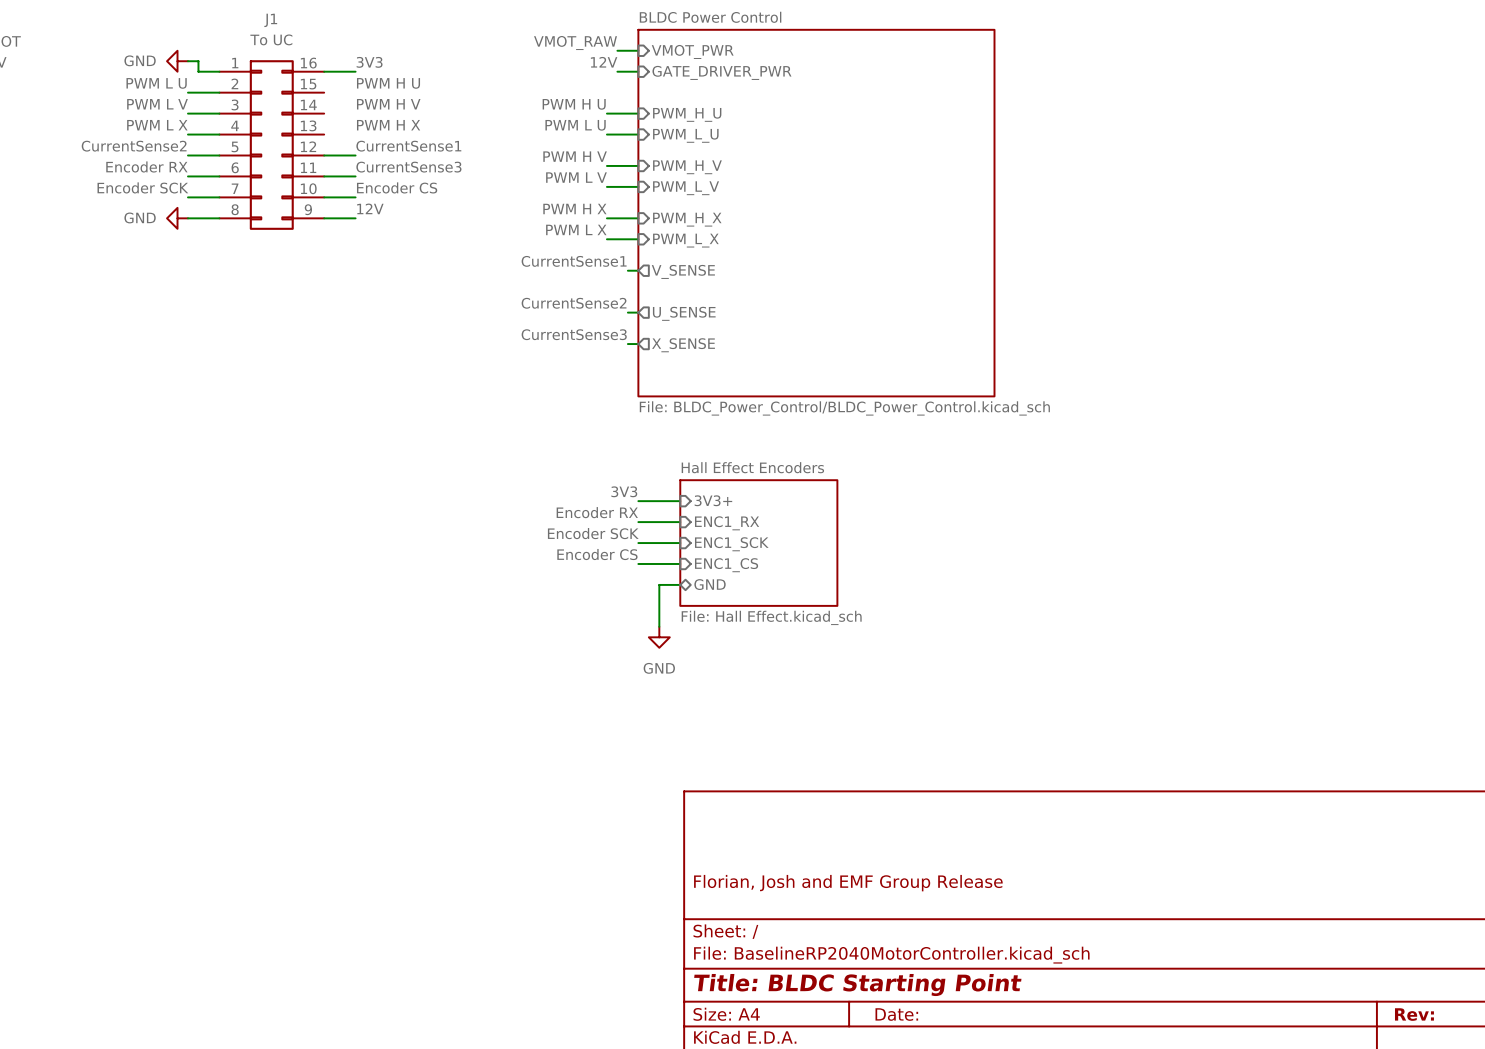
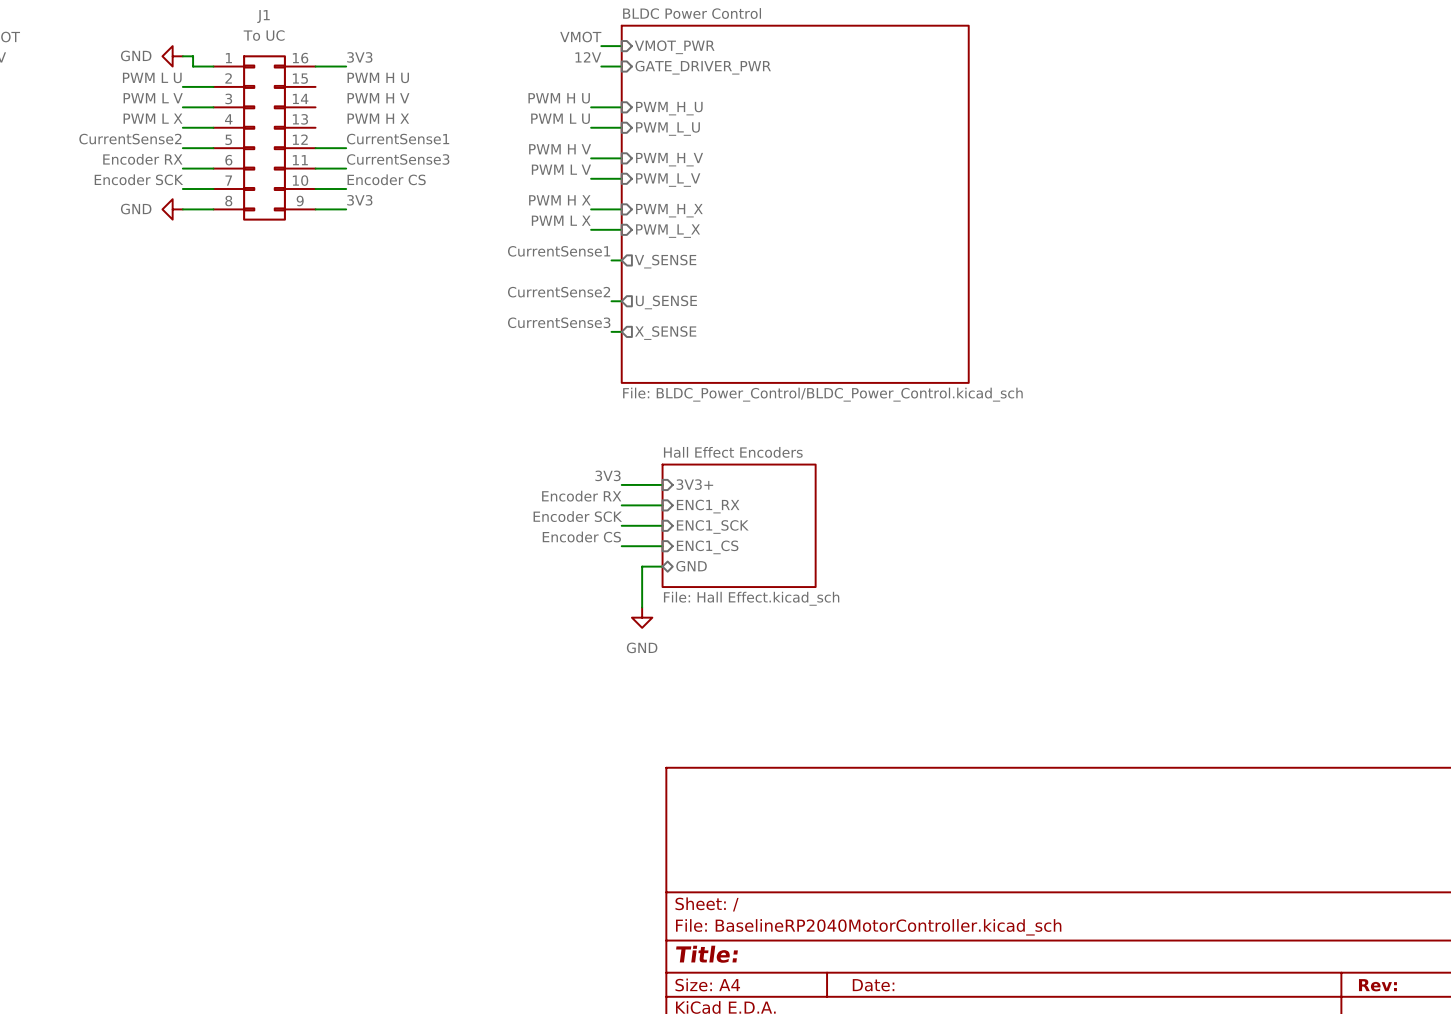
label: VMOT_RAW (575, 43) -> VMOT (580, 37)
label: 12V (370, 208) -> 3V3 (359, 200)
title block: Florian, Josh and EMF Group Release (848, 883) -> none
title block: Title: BLDC Starting Point (857, 985) -> Title: (706, 954)

